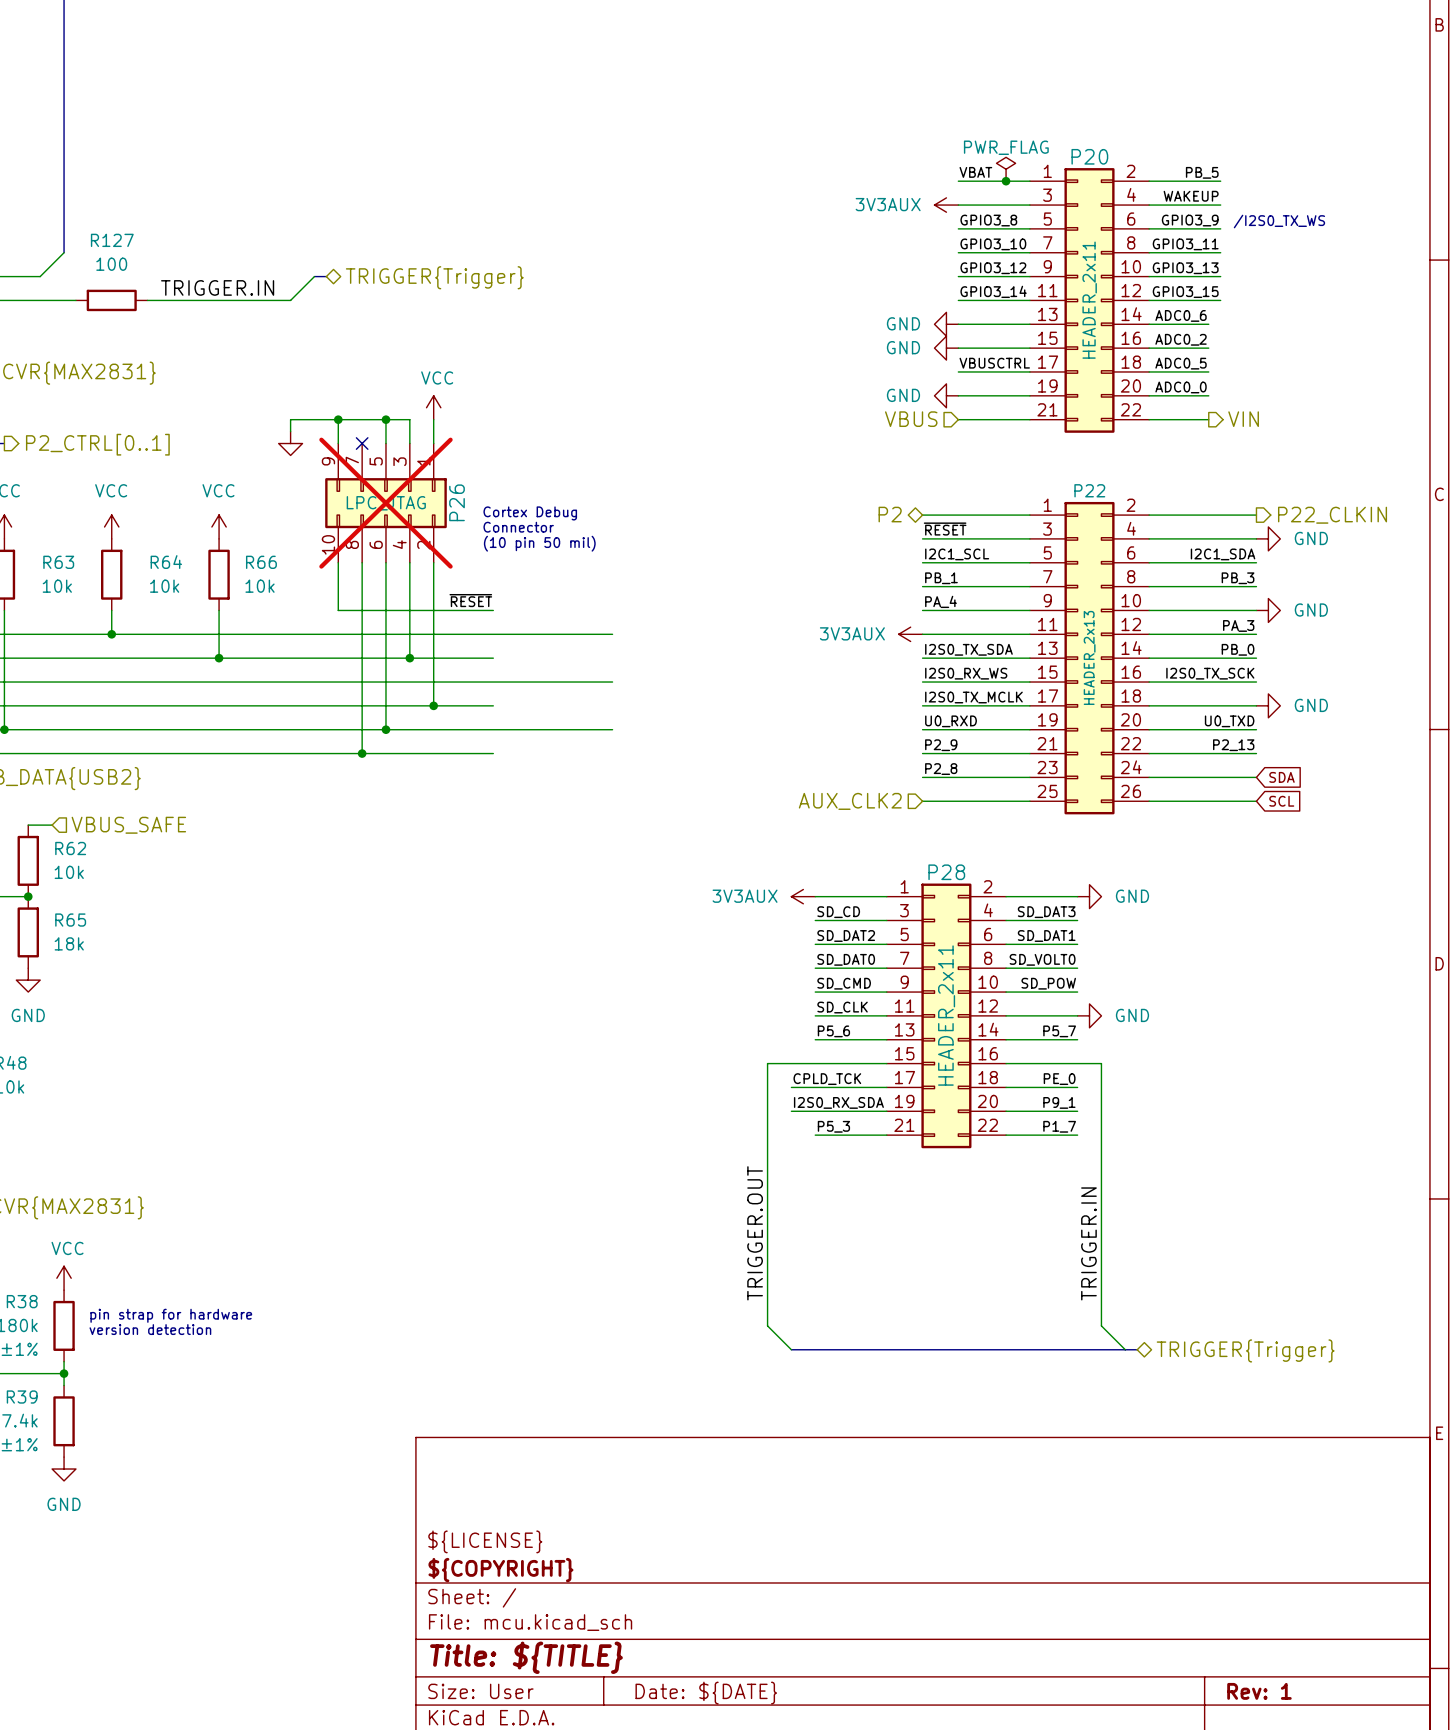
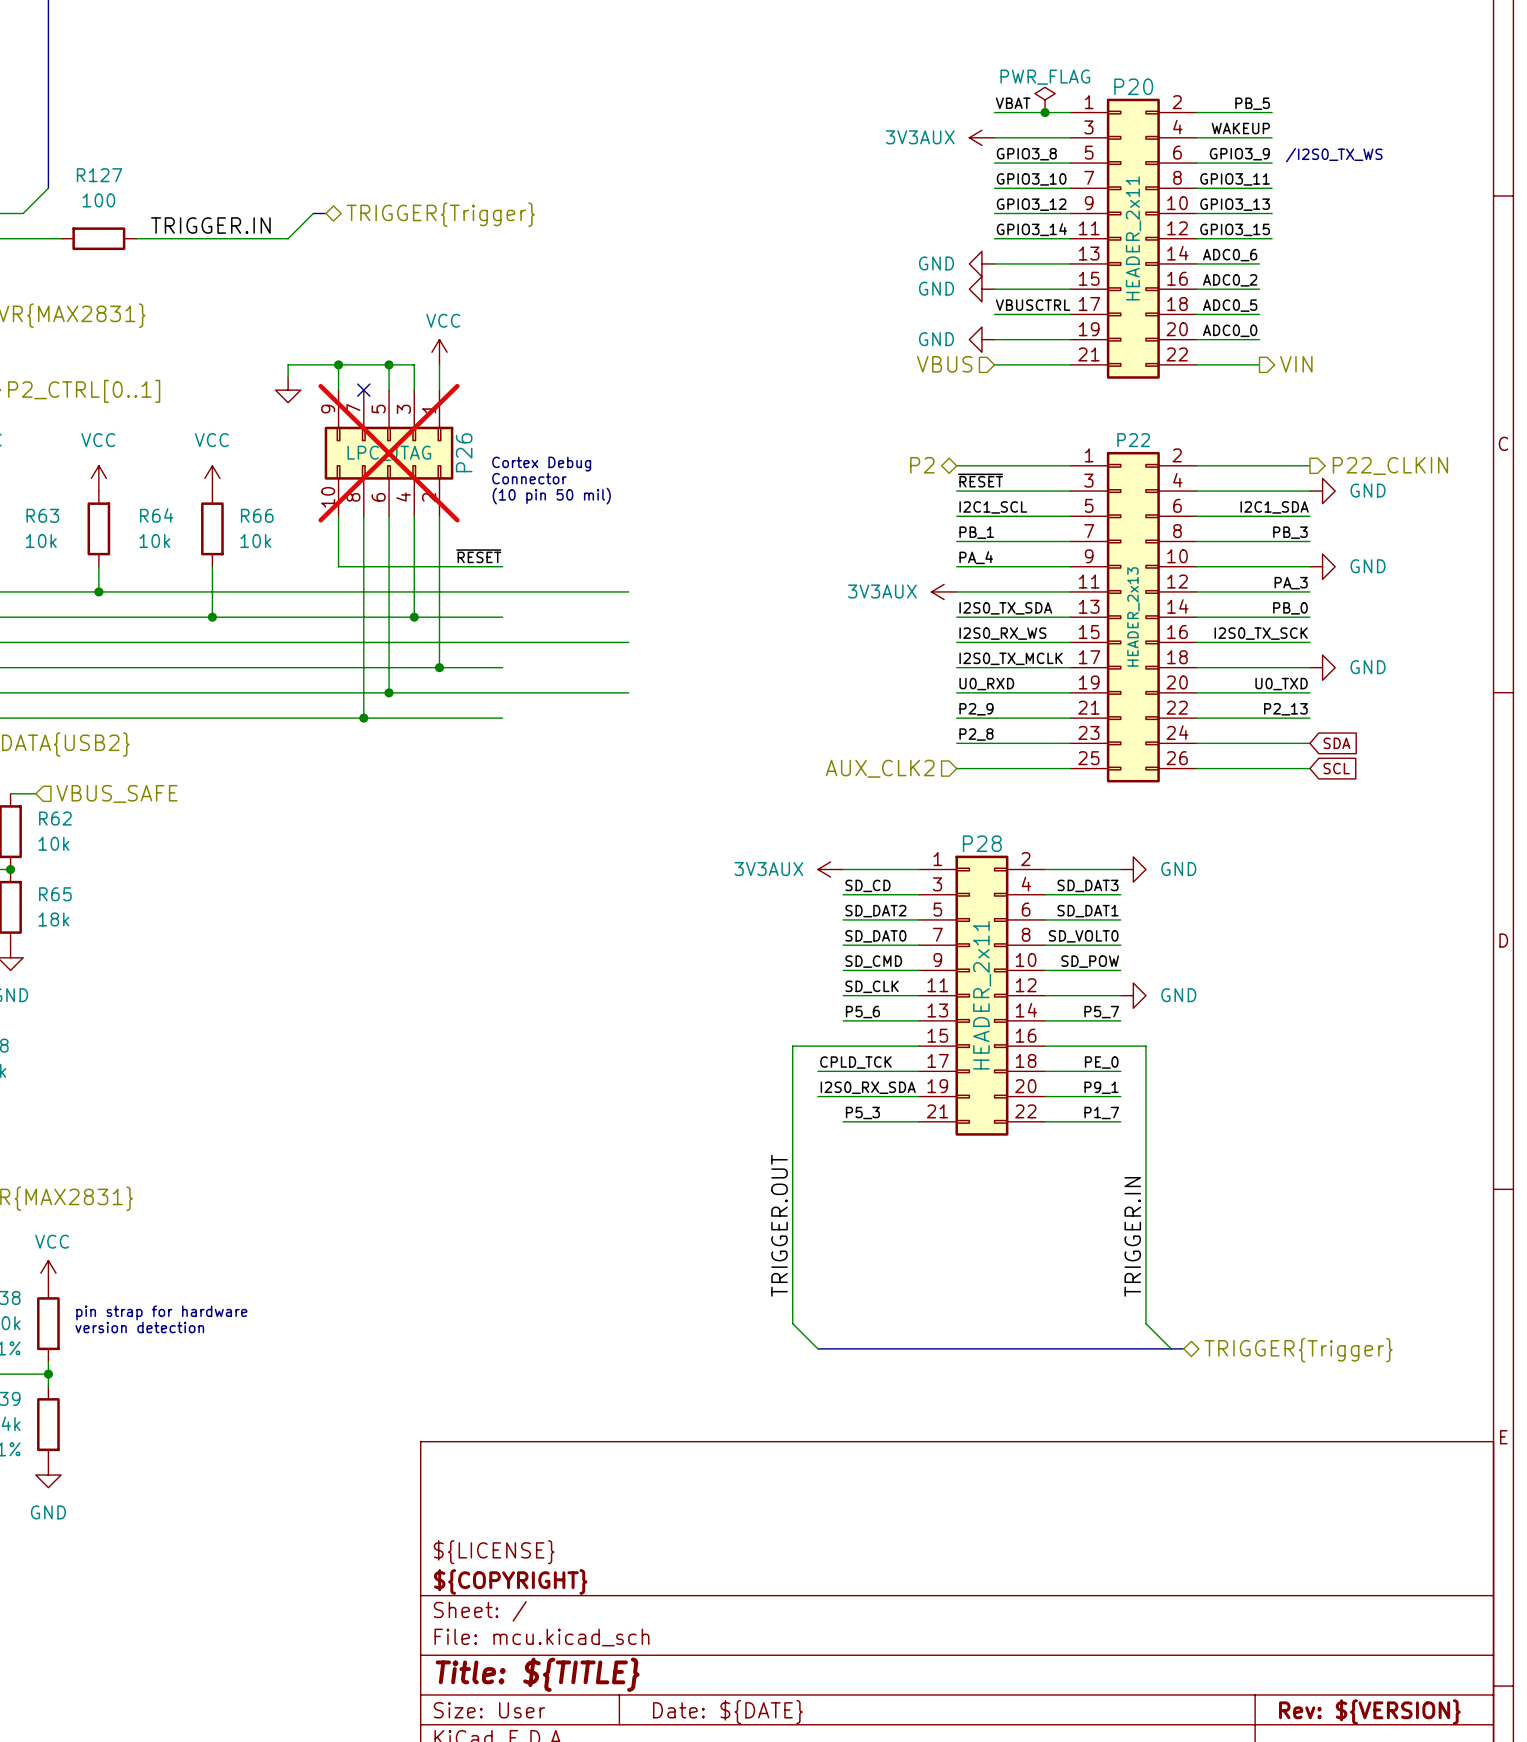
title block: Rev: 1 (1259, 1691) -> Rev: ${VERSION} (1369, 1712)

